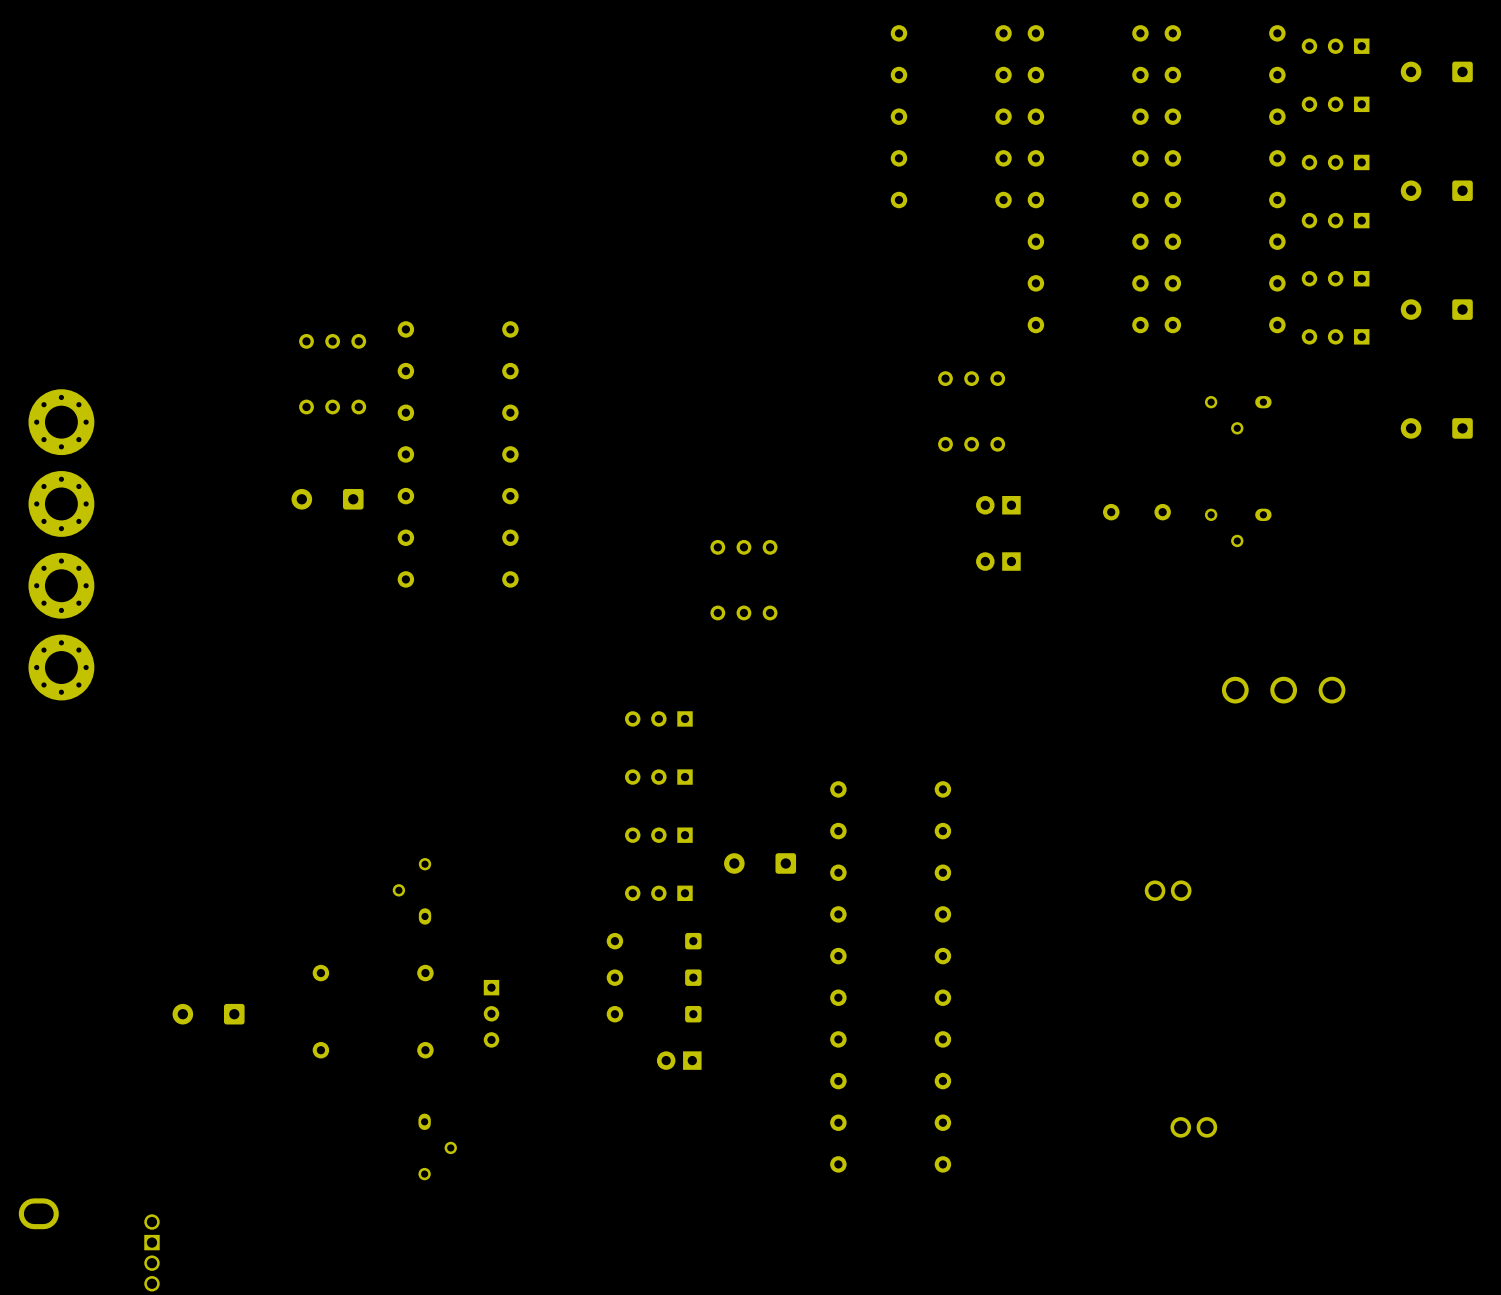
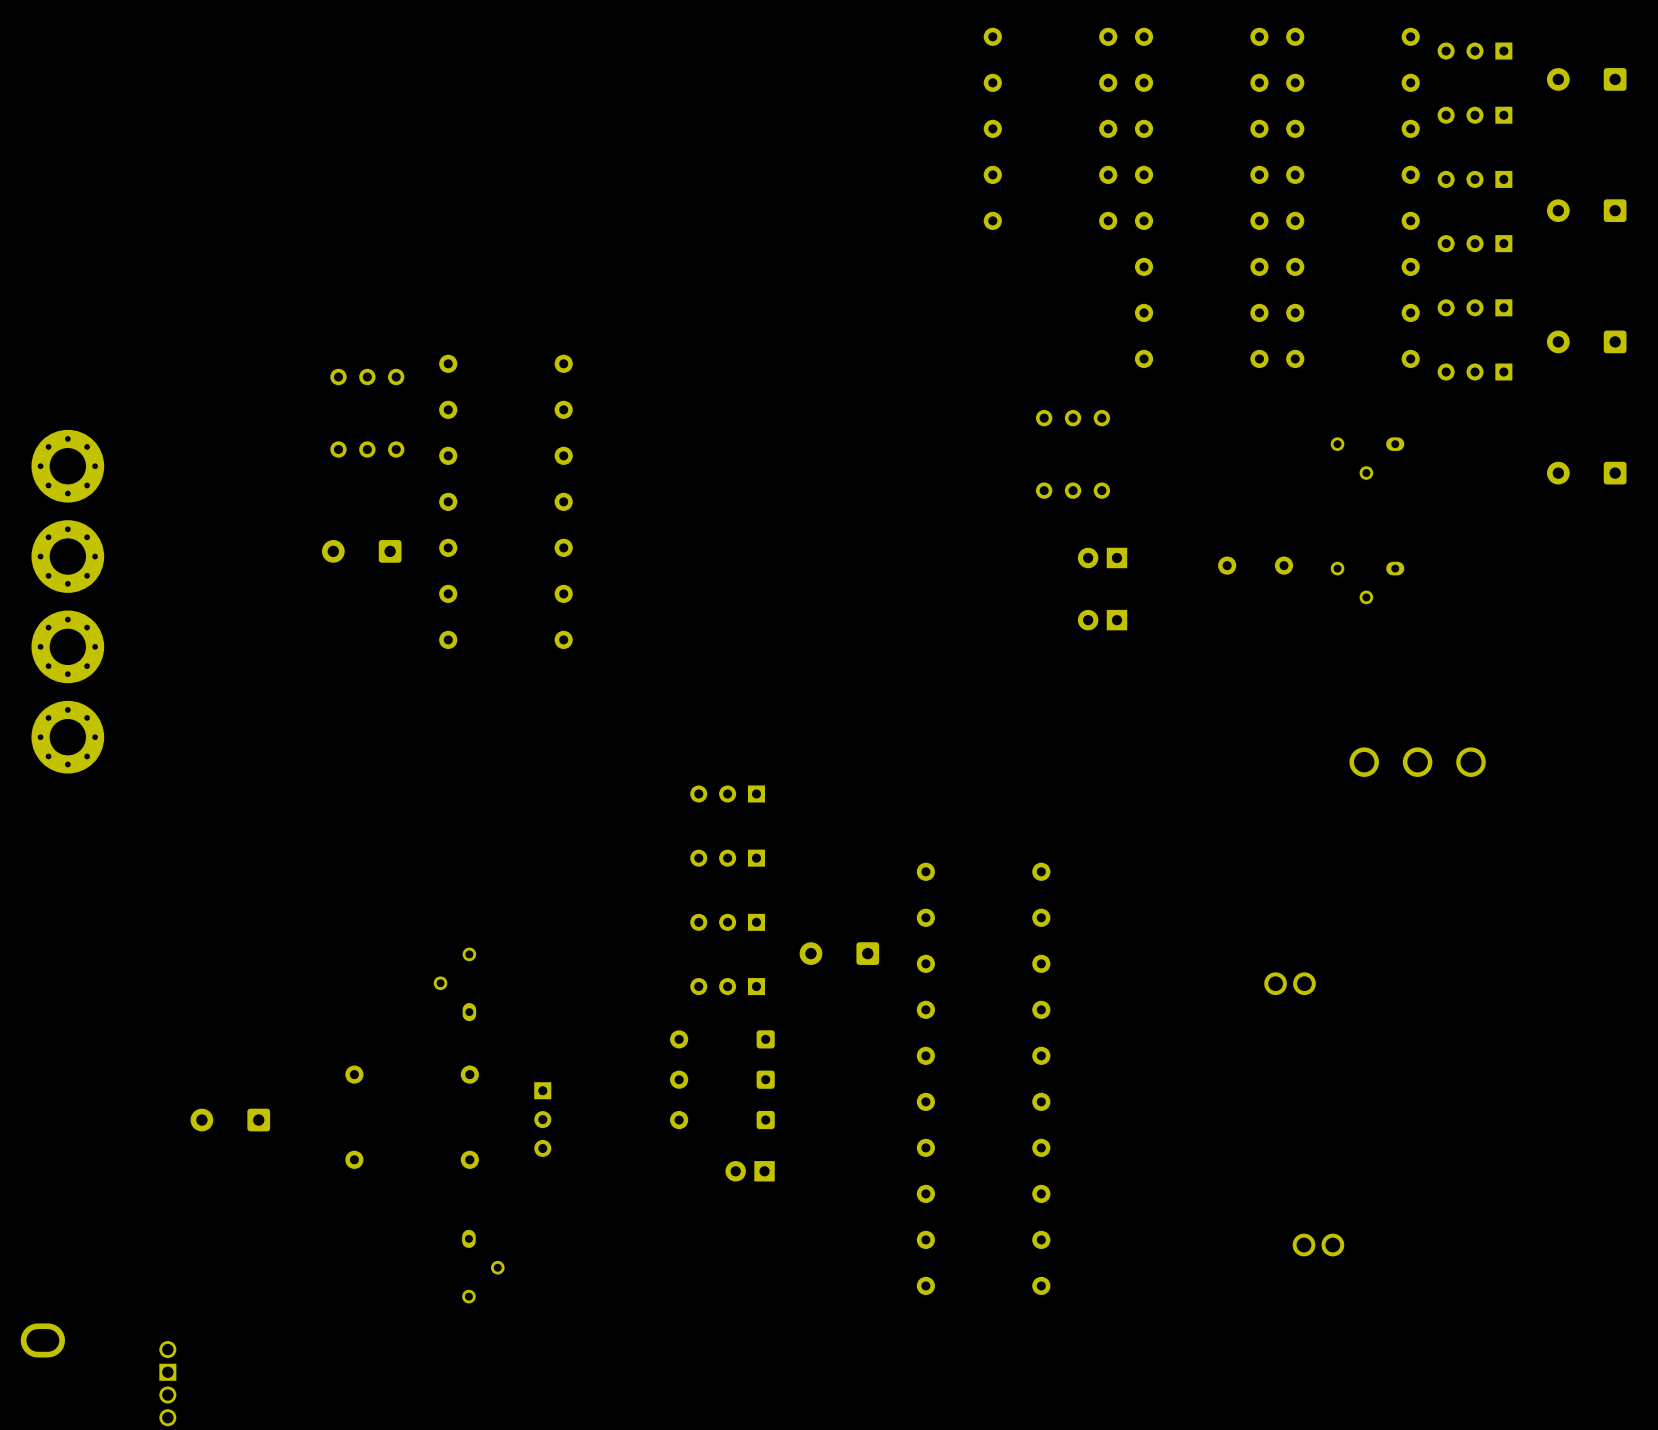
part: (743, 547) -> none
part: (743, 612) -> none

